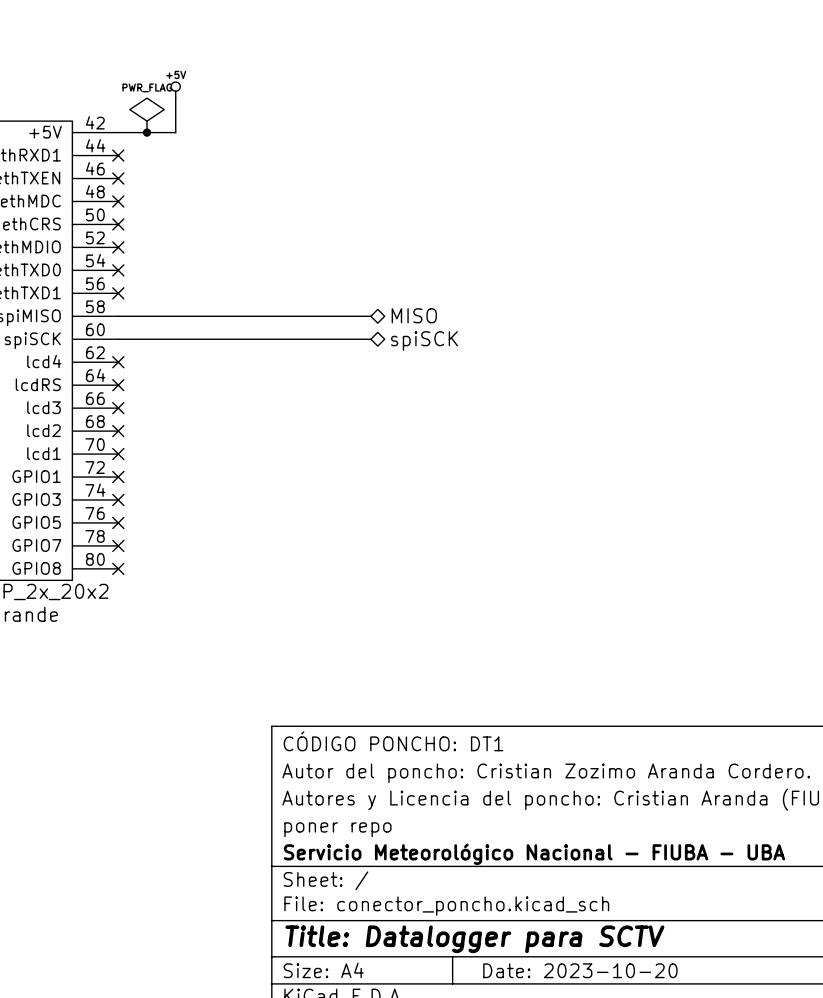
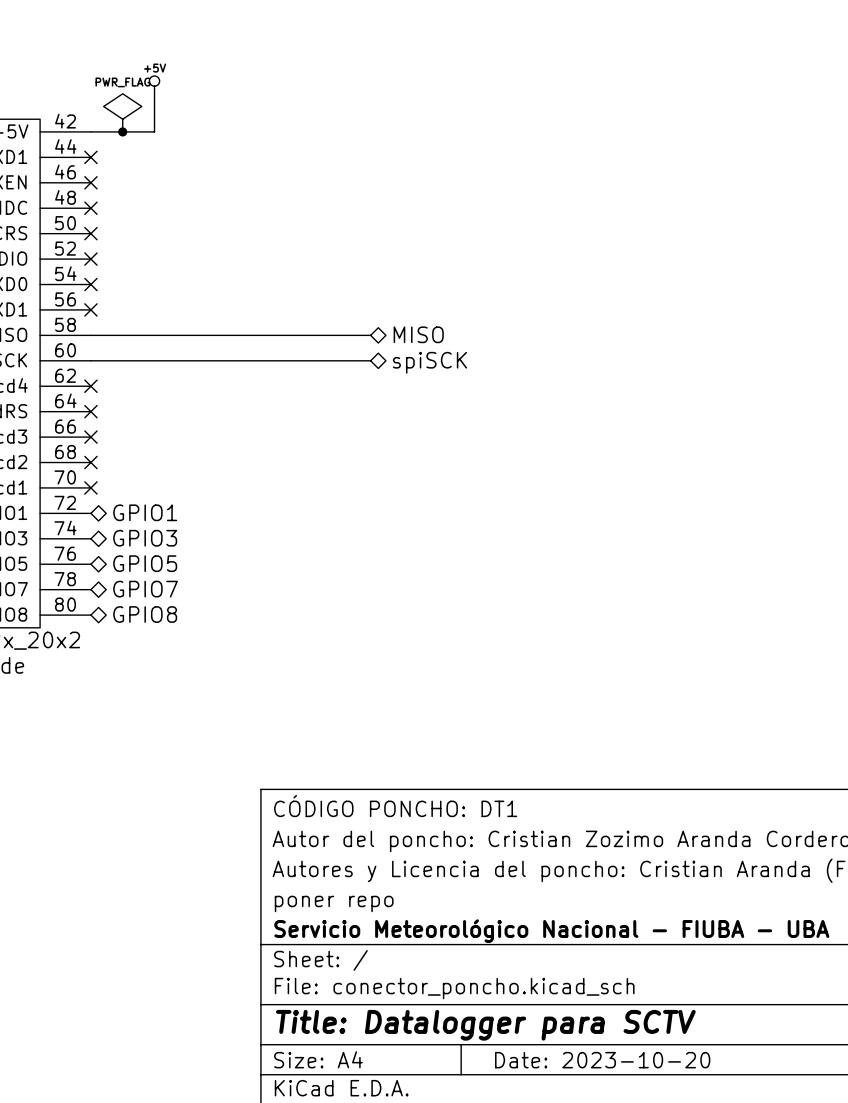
hierarchical label: none -> GPIO1 (145, 512)
no-connect mark: (118, 477) -> none
no-connect mark: (118, 499) -> none
hierarchical label: none -> GPIO3 (145, 538)
no-connect mark: (118, 522) -> none
hierarchical label: none -> GPIO5 (145, 563)
no-connect mark: (118, 545) -> none
hierarchical label: none -> GPIO7 (145, 589)
no-connect mark: (118, 568) -> none
hierarchical label: none -> GPIO8 (145, 614)

